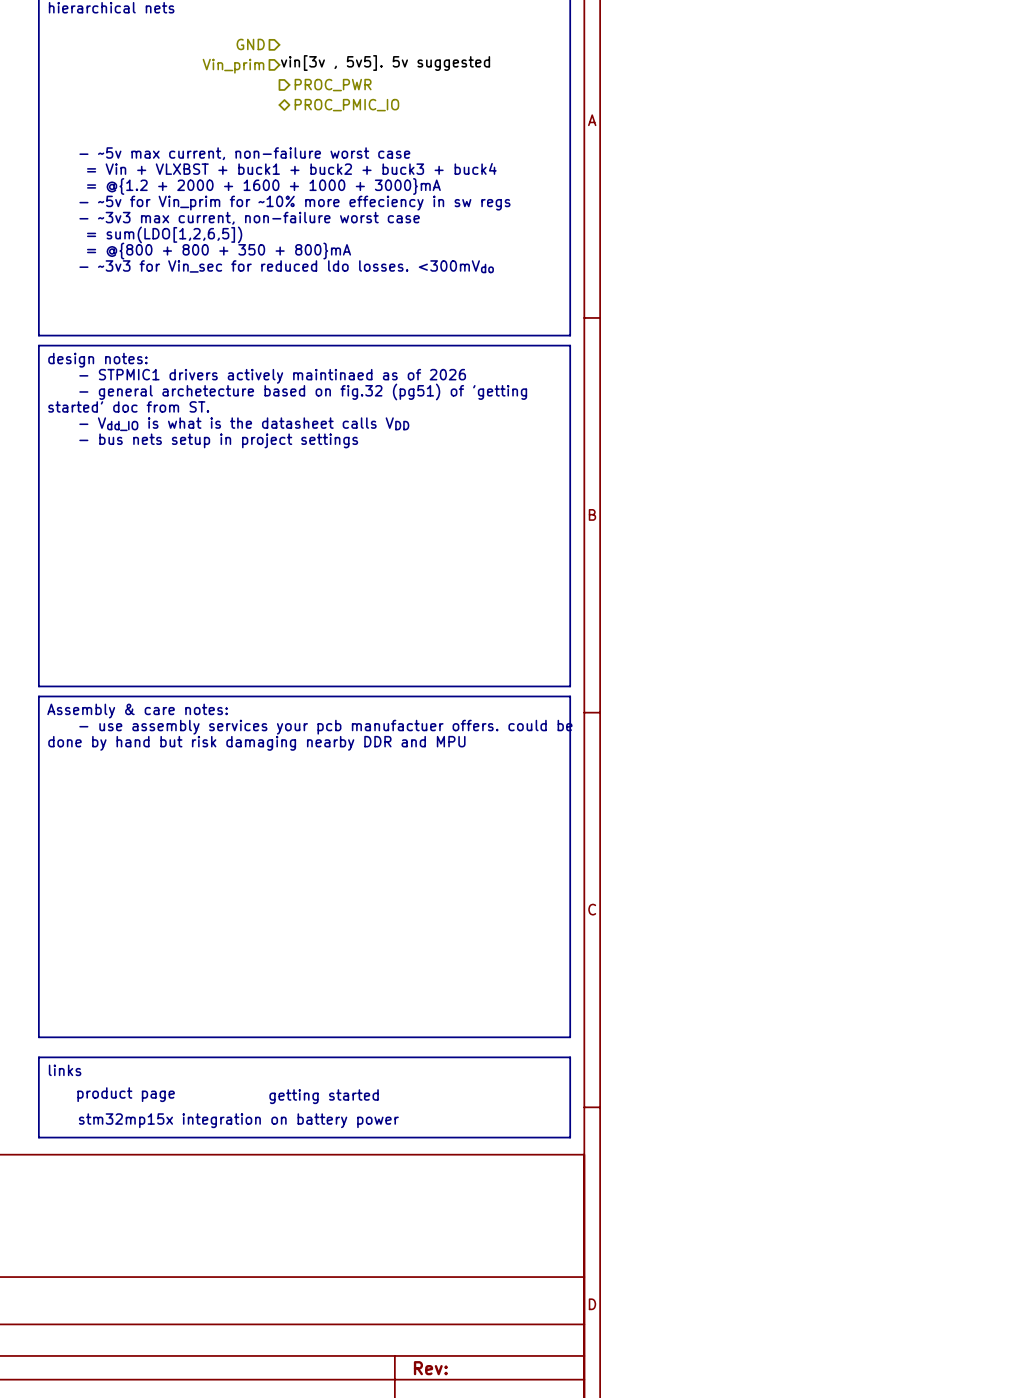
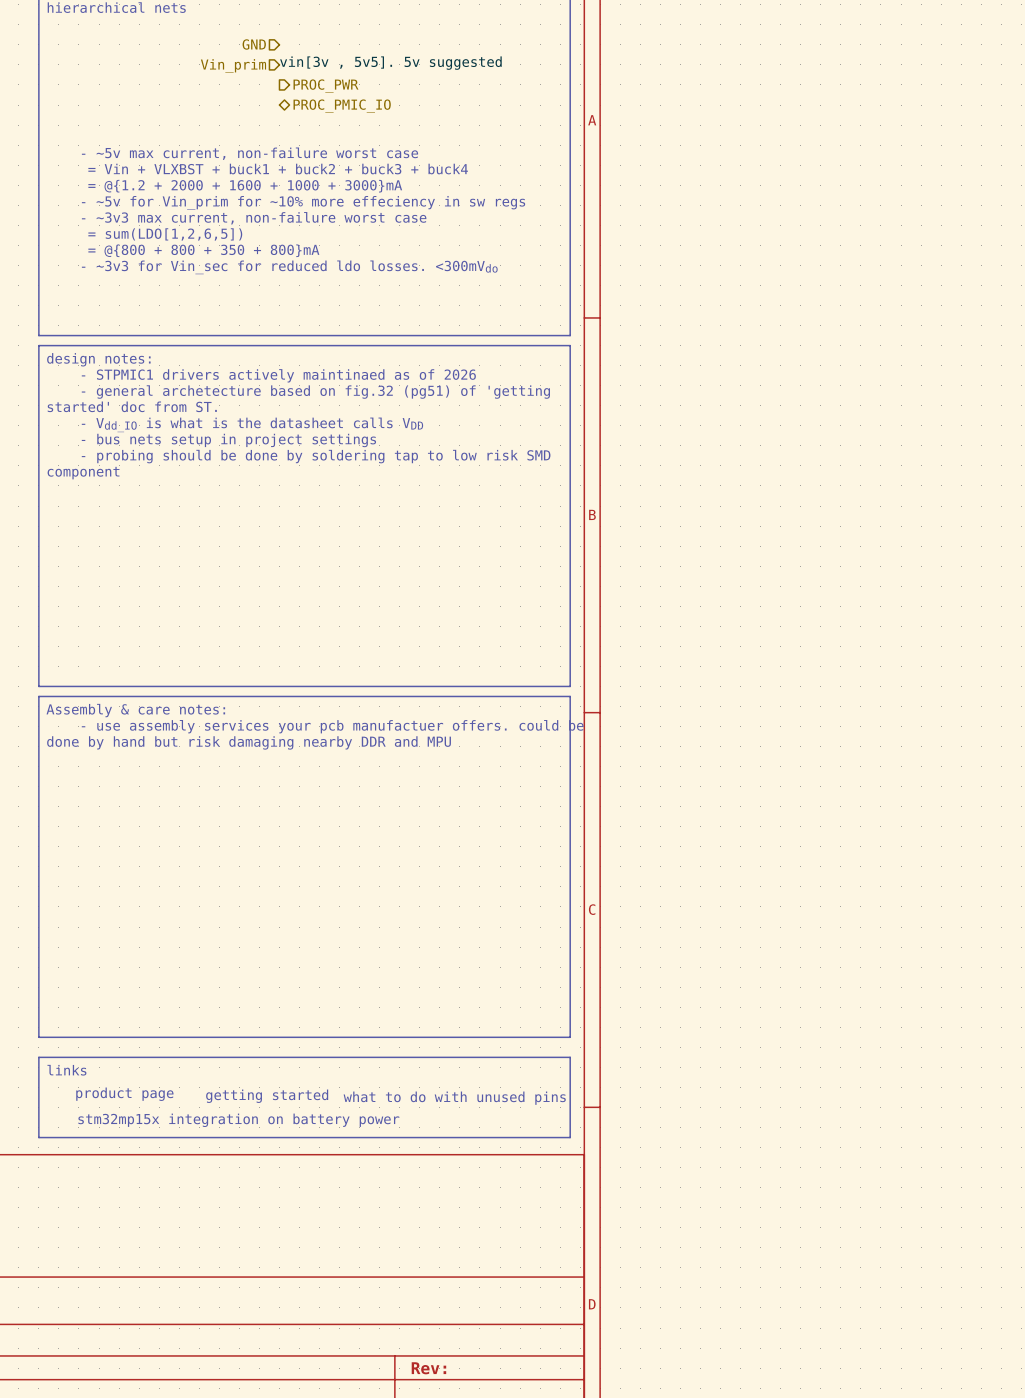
text: none -> - probing should be done by soldering tap to low risk SMD (316, 456)
text: none -> component (83, 473)
text position: getting started (324, 1096) -> getting started (267, 1096)
text: none -> what to do with unused pins (454, 1098)

